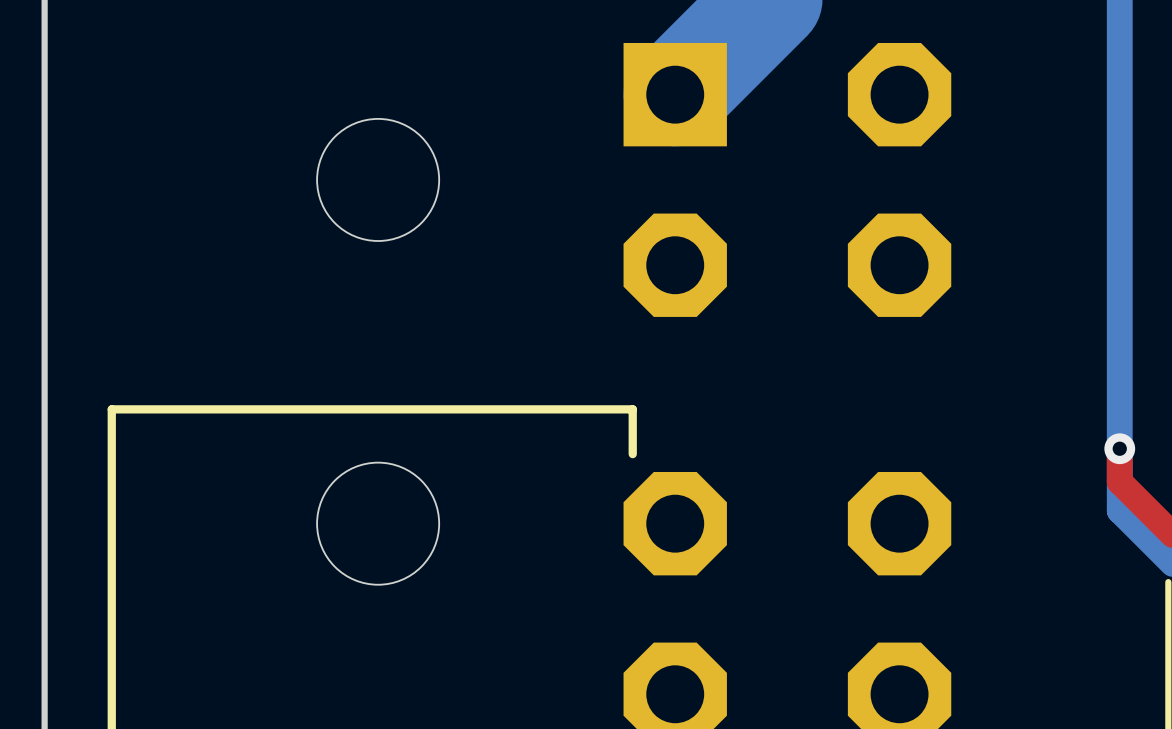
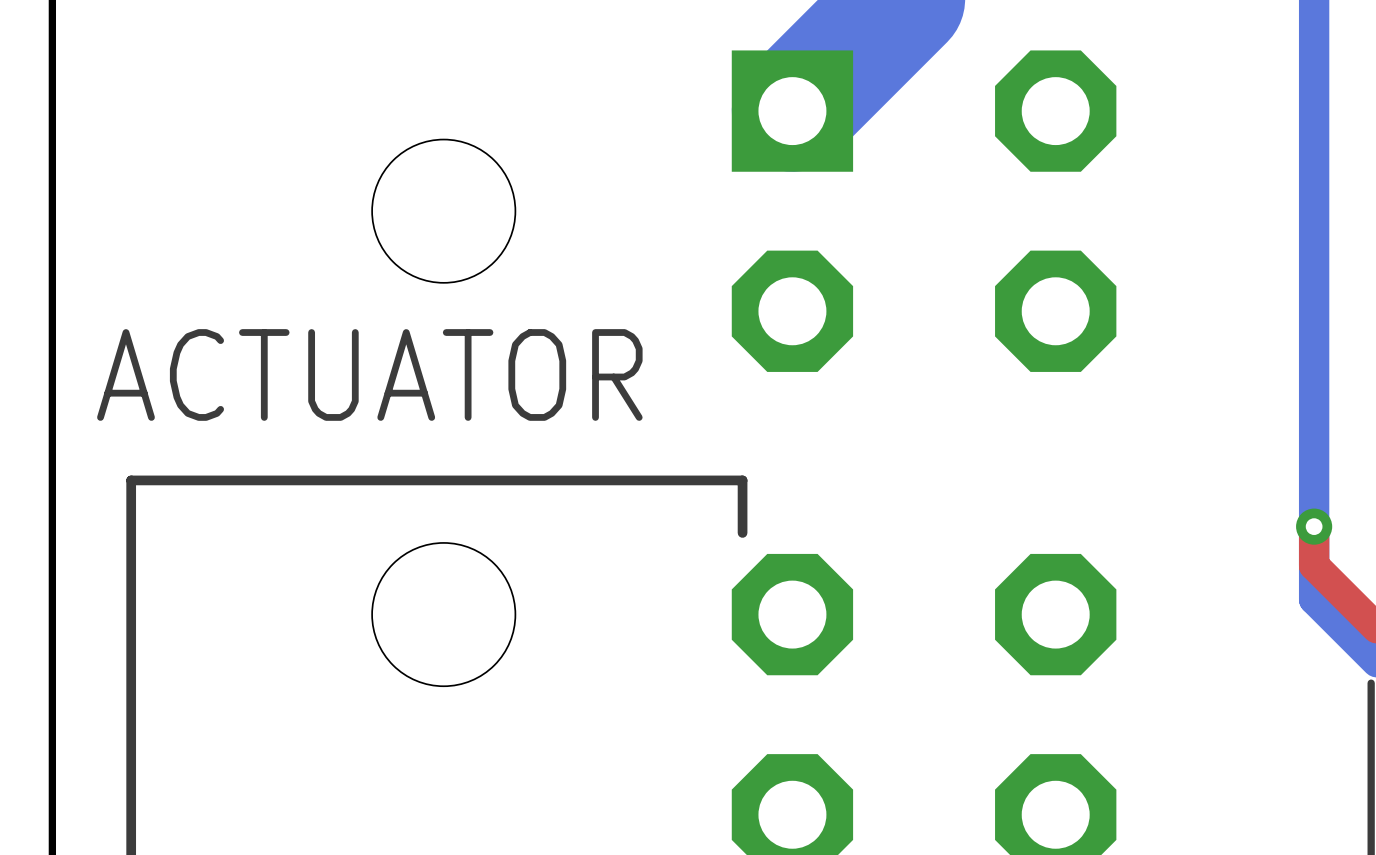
text: none -> ACTUATOR (369, 374)

